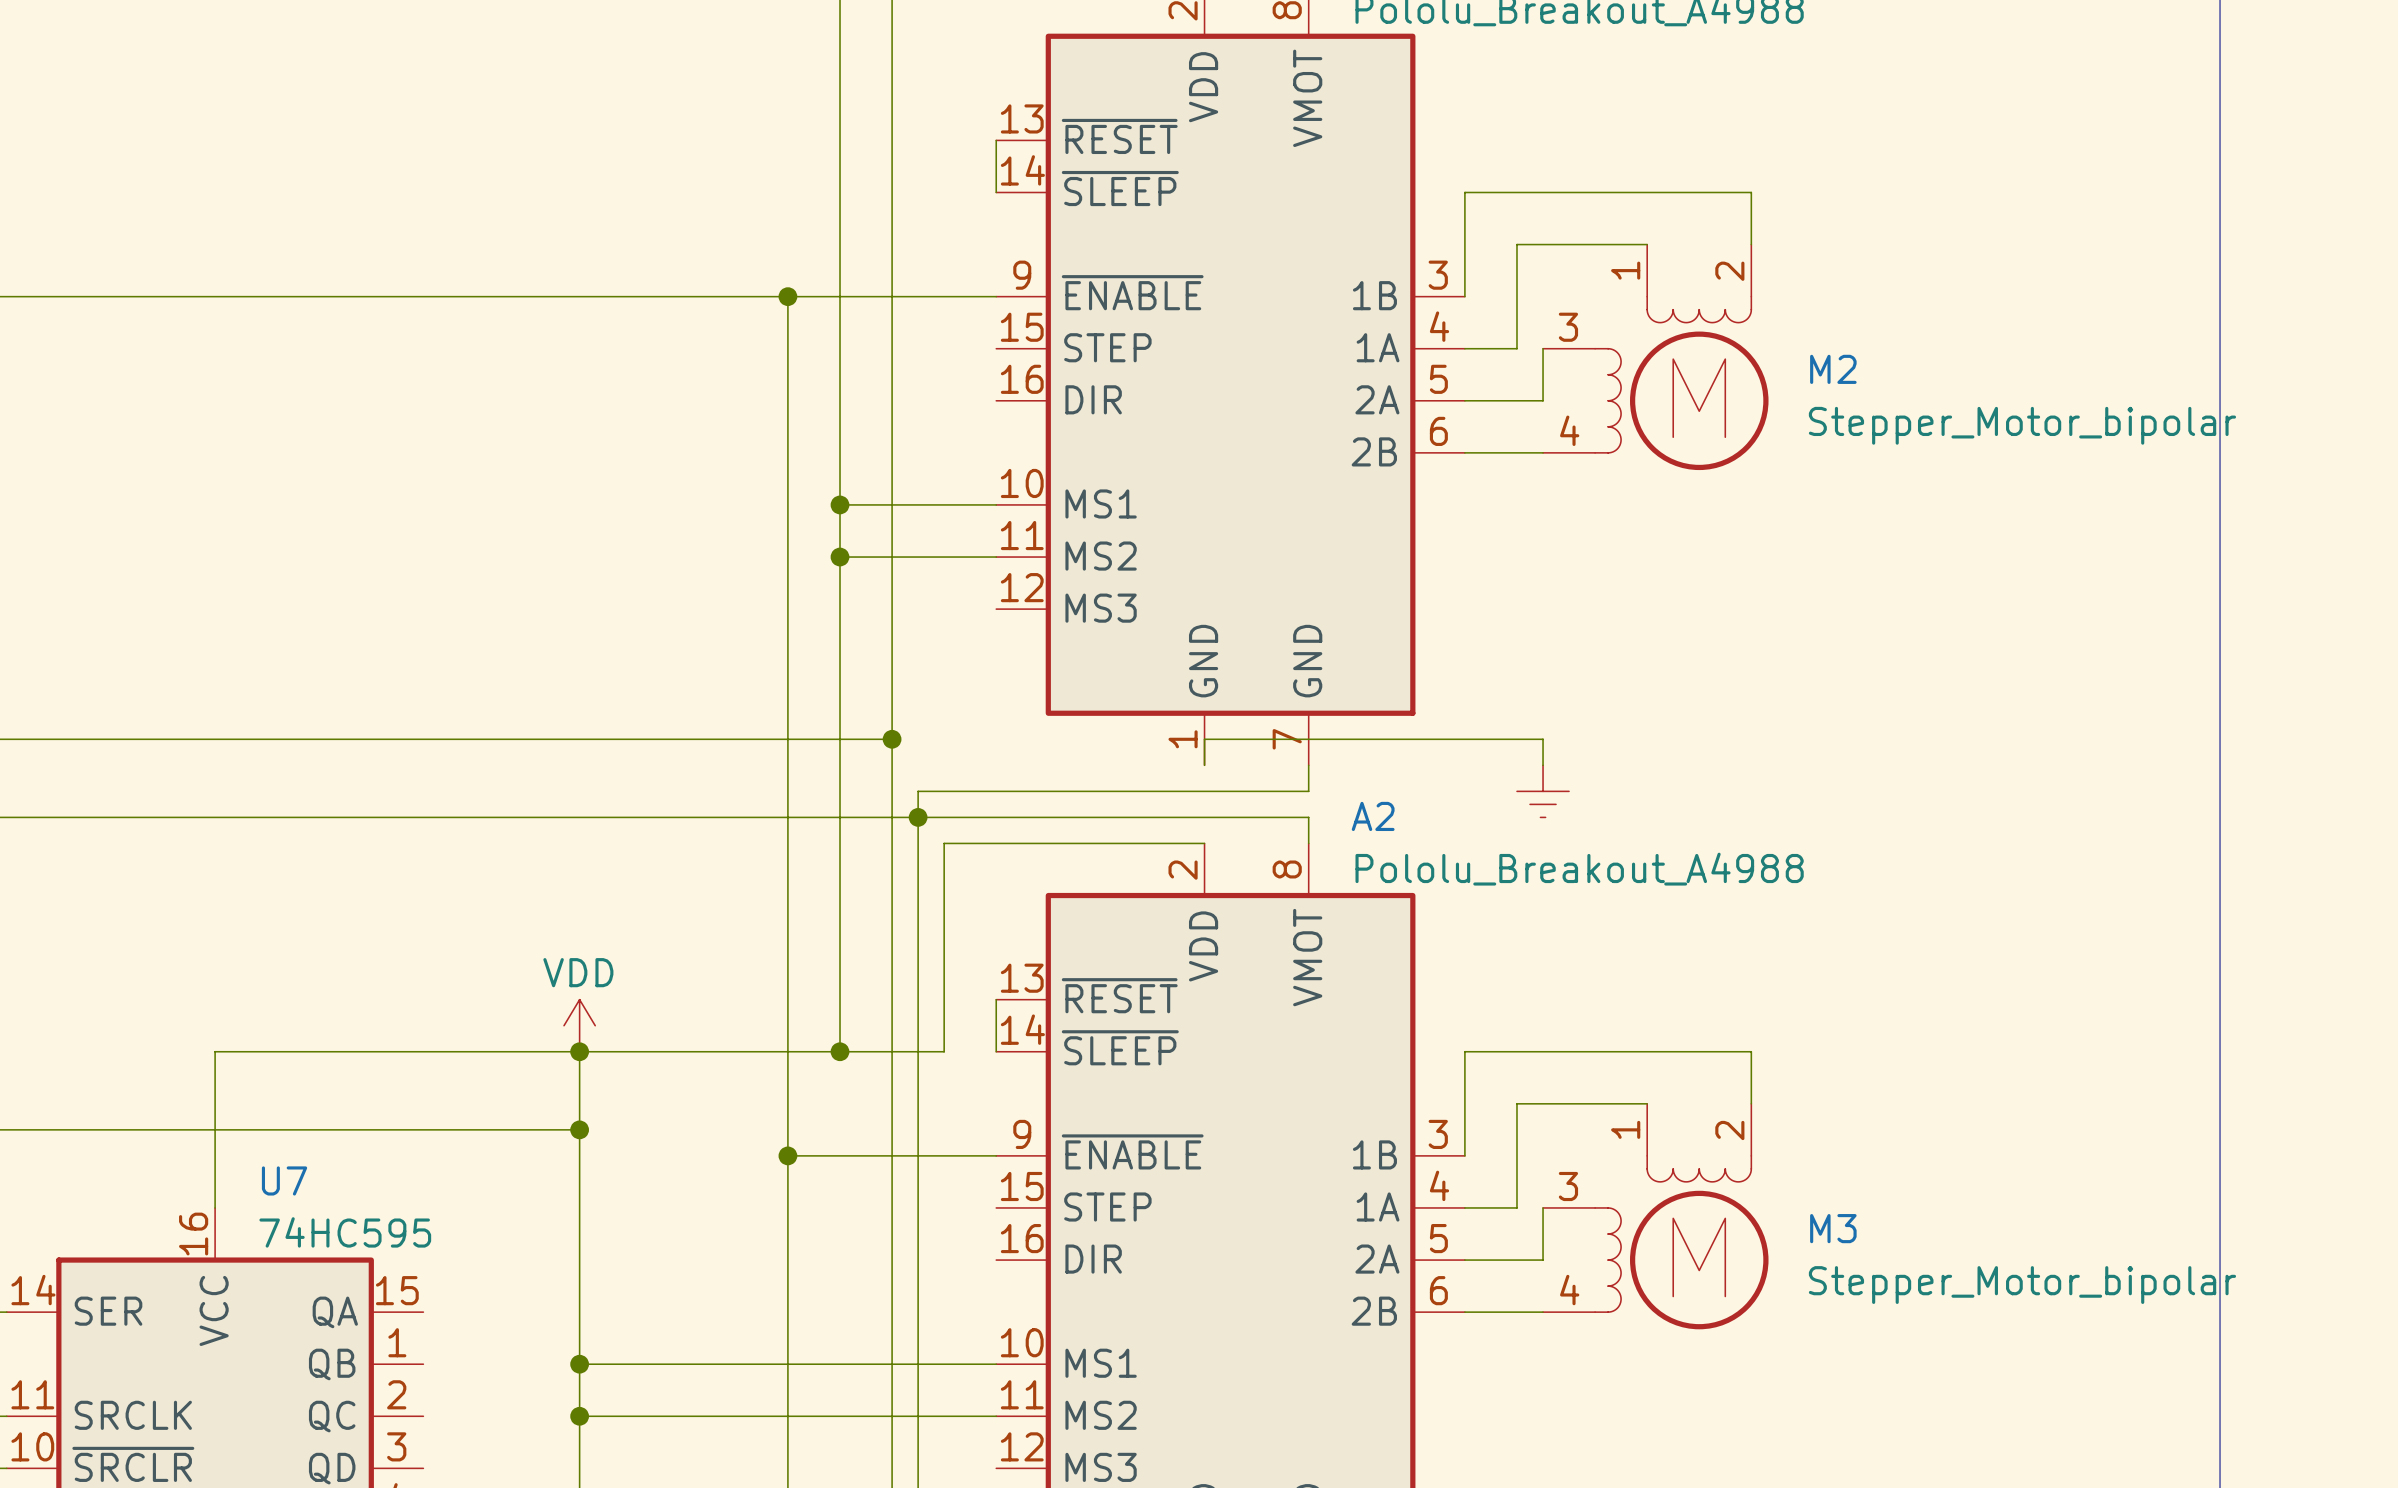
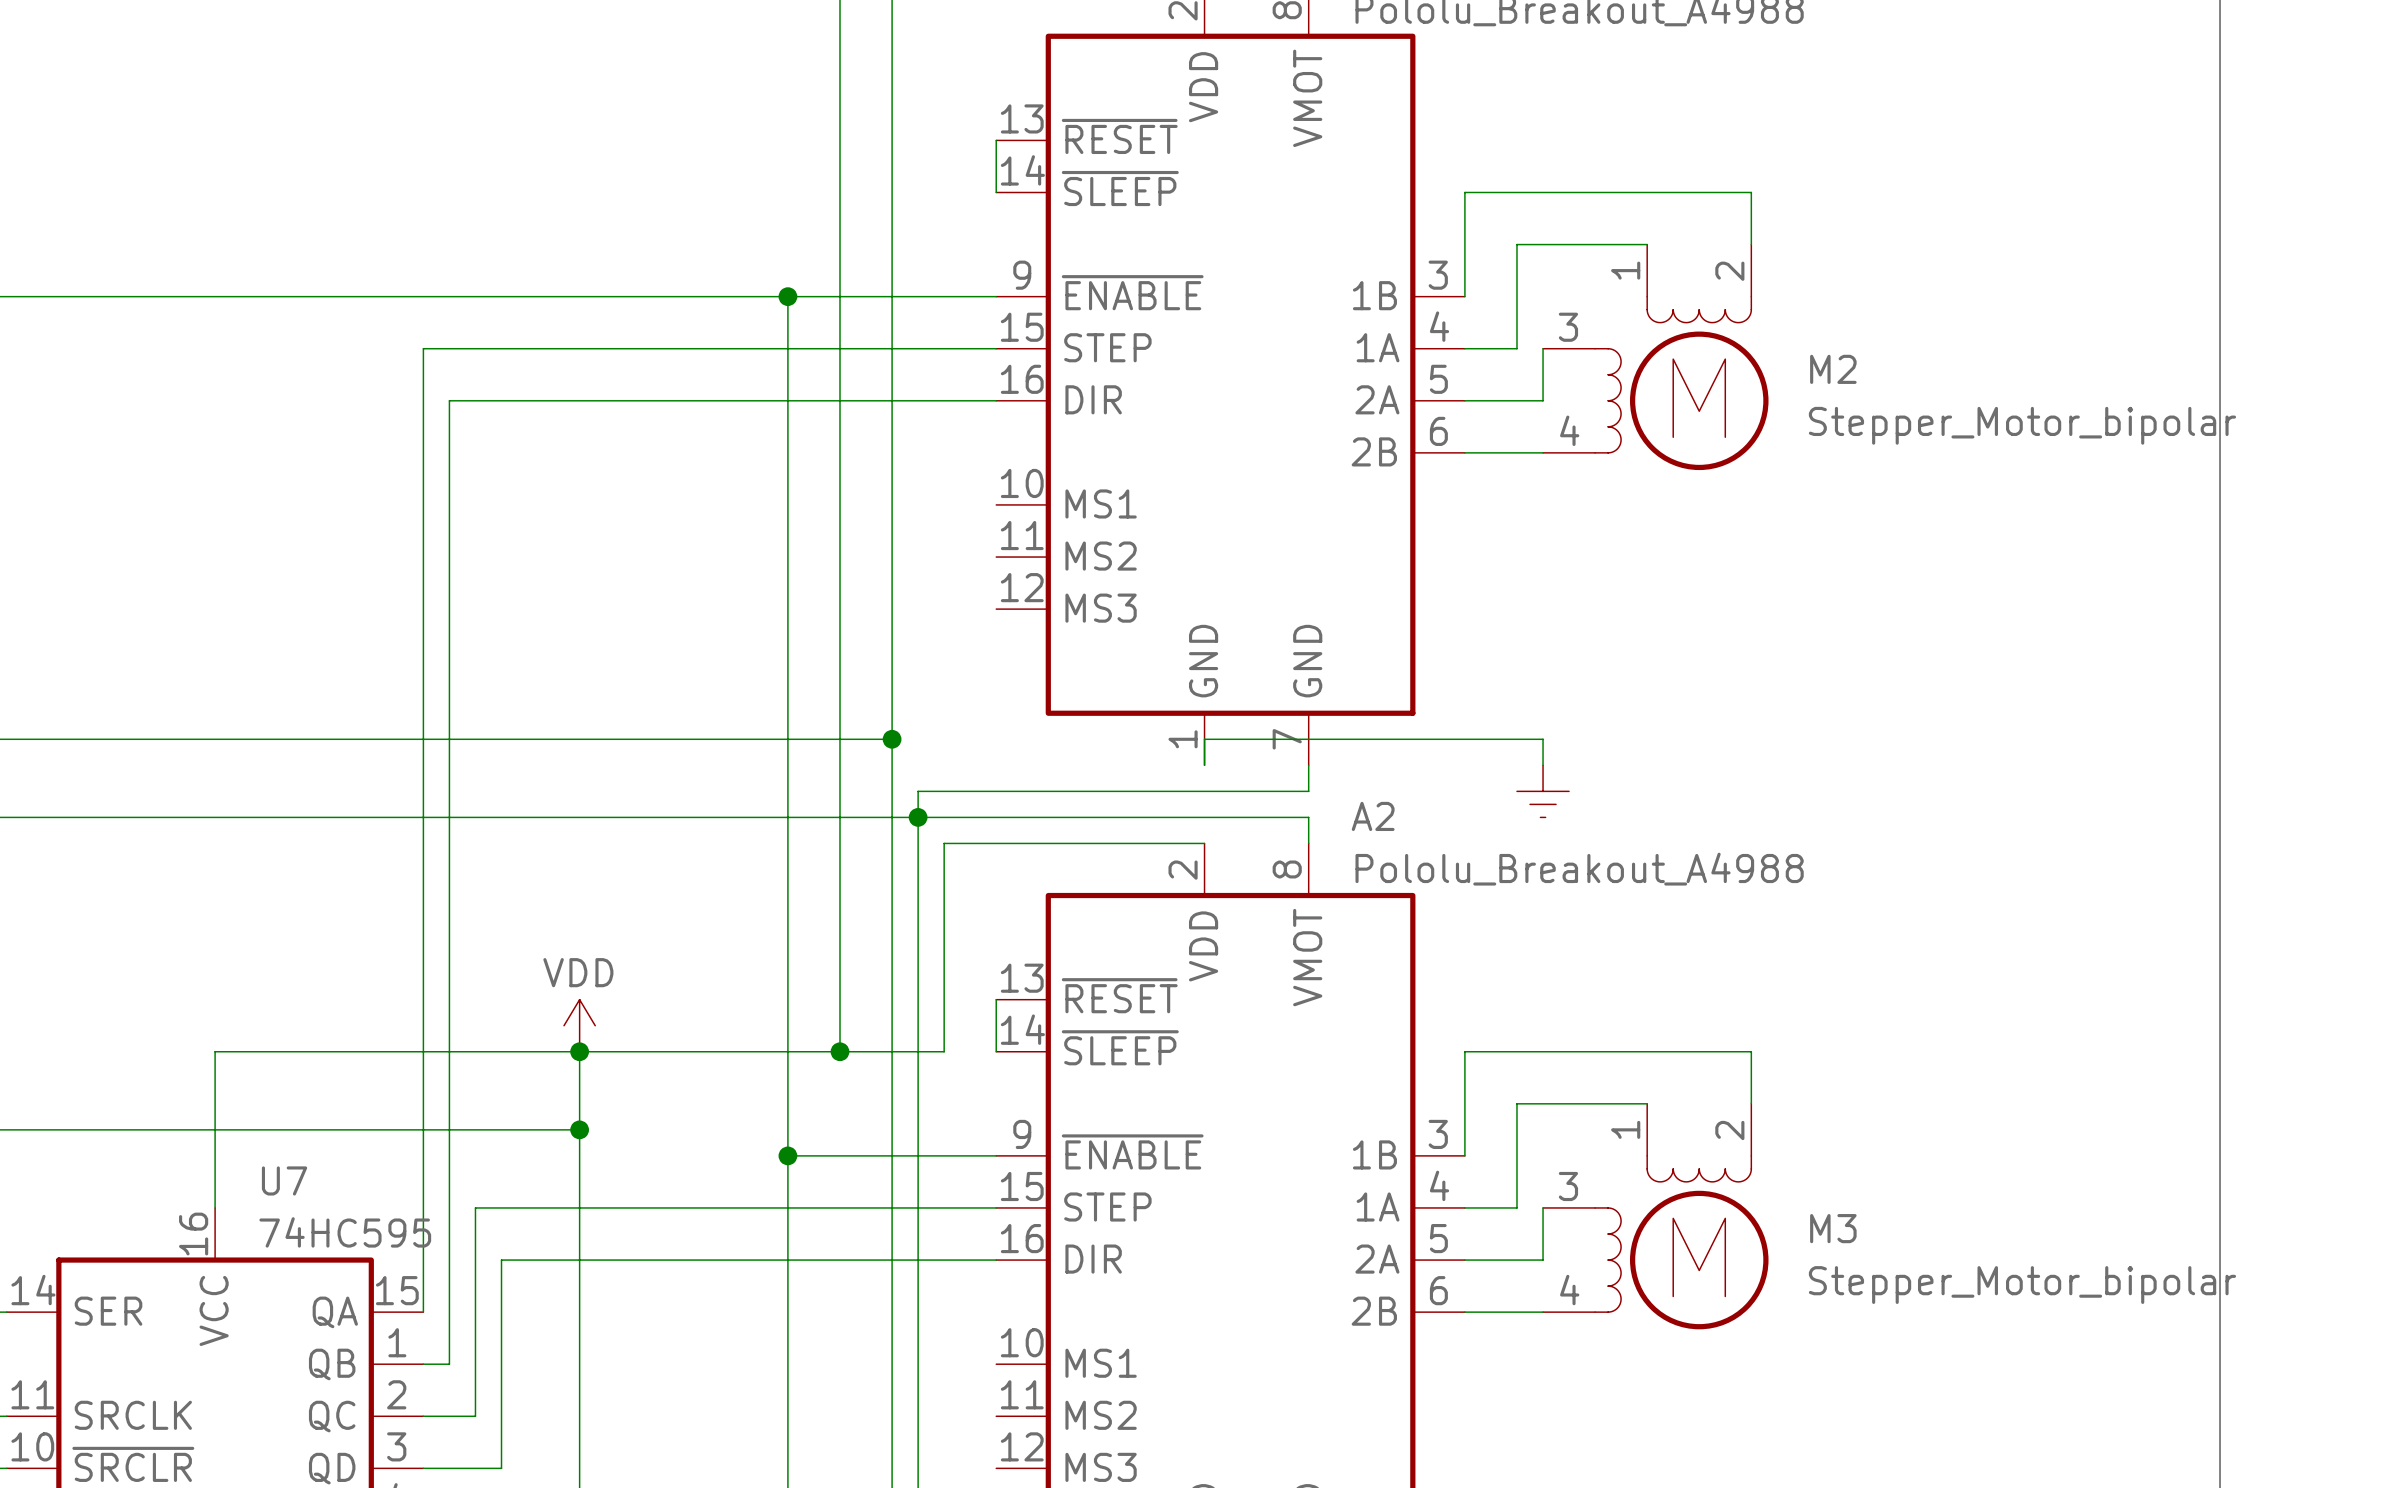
wire: none -> (996, 348) (423, 348) (423, 1312)
wire: none -> (996, 400) (449, 400) (449, 1364) (423, 1364)
wire: (840, 504) (996, 504) -> none
junction: (840, 504) -> none
wire: (840, 557) (996, 557) -> none
junction: (840, 557) -> none
wire: none -> (996, 1207) (475, 1207) (475, 1416) (423, 1416)
wire: none -> (996, 1260) (501, 1260) (501, 1468) (423, 1468)
wire: (579, 1364) (996, 1364) -> none
junction: (579, 1364) -> none
wire: (579, 1416) (996, 1416) -> none
junction: (579, 1416) -> none

